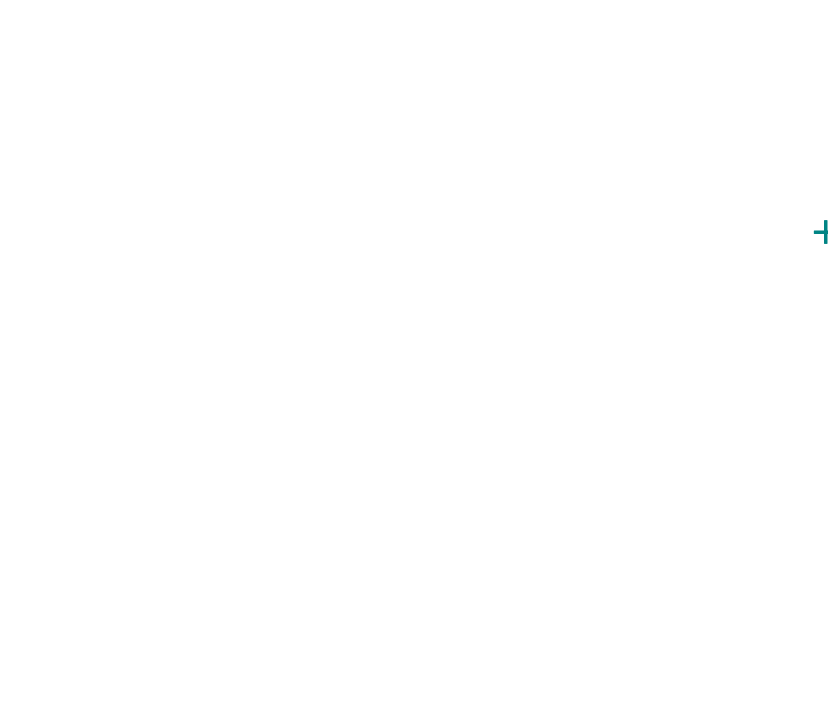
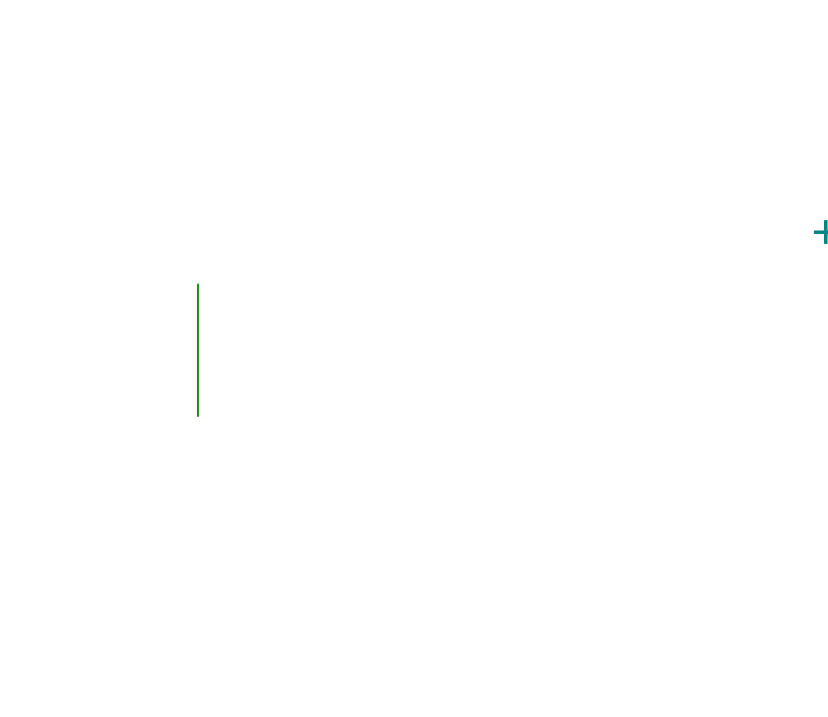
wire: none -> (197, 284) (197, 416)

